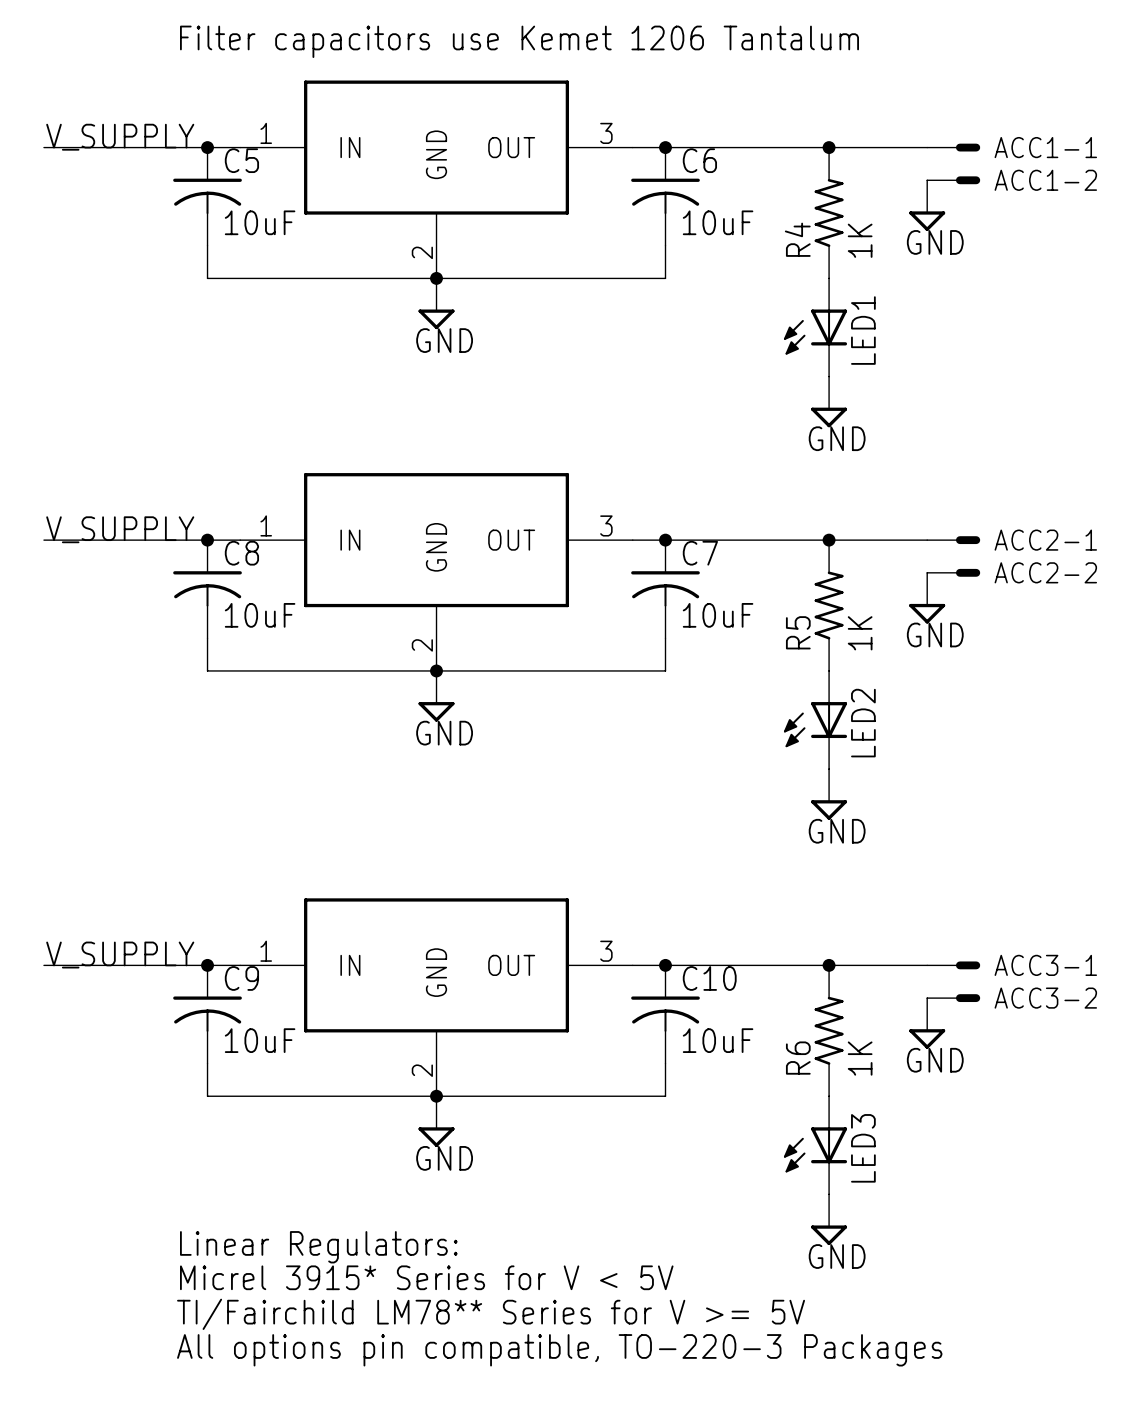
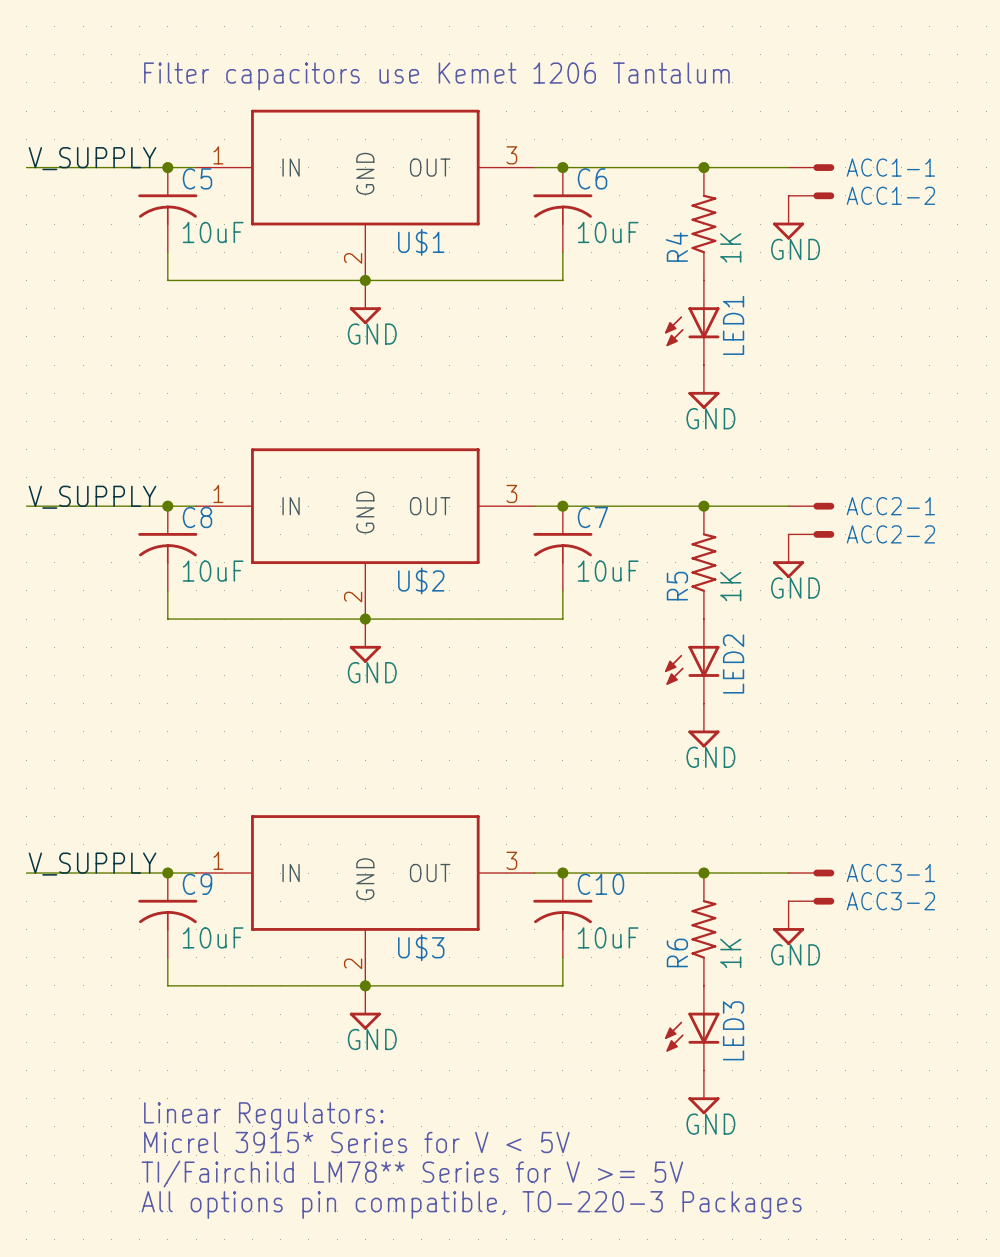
U$1 name: none -> U$1 (421, 242)
U$2 name: none -> U$2 (421, 580)
U$3 name: none -> U$3 (421, 947)

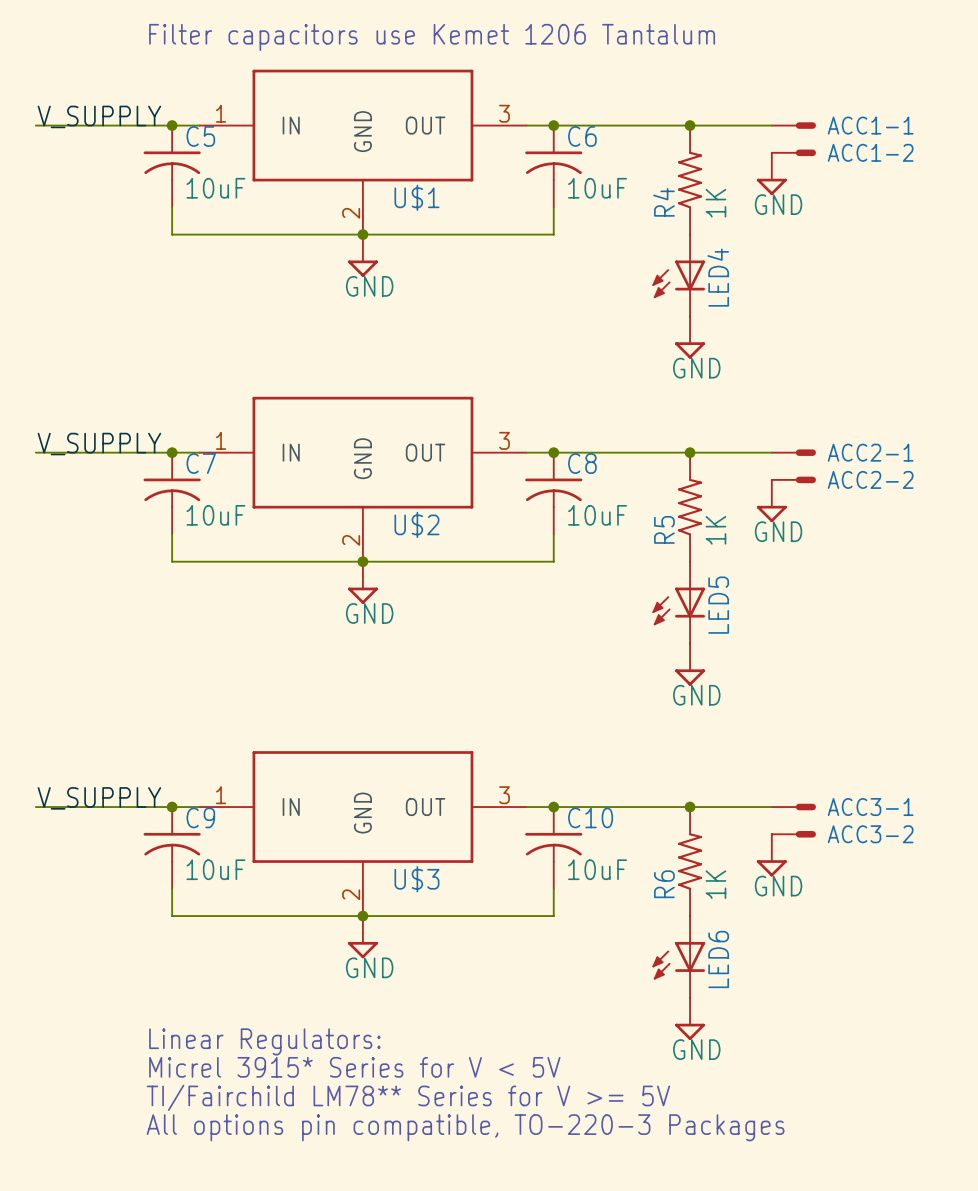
LED1 name: LED1 (733, 325) -> LED4 (718, 277)
C8 name: C8 (197, 517) -> C7 (201, 463)
C7 name: C7 (592, 517) -> C8 (582, 463)
LED2 name: LED2 (733, 664) -> LED5 (718, 605)
LED3 name: LED3 (733, 1030) -> LED6 (718, 959)

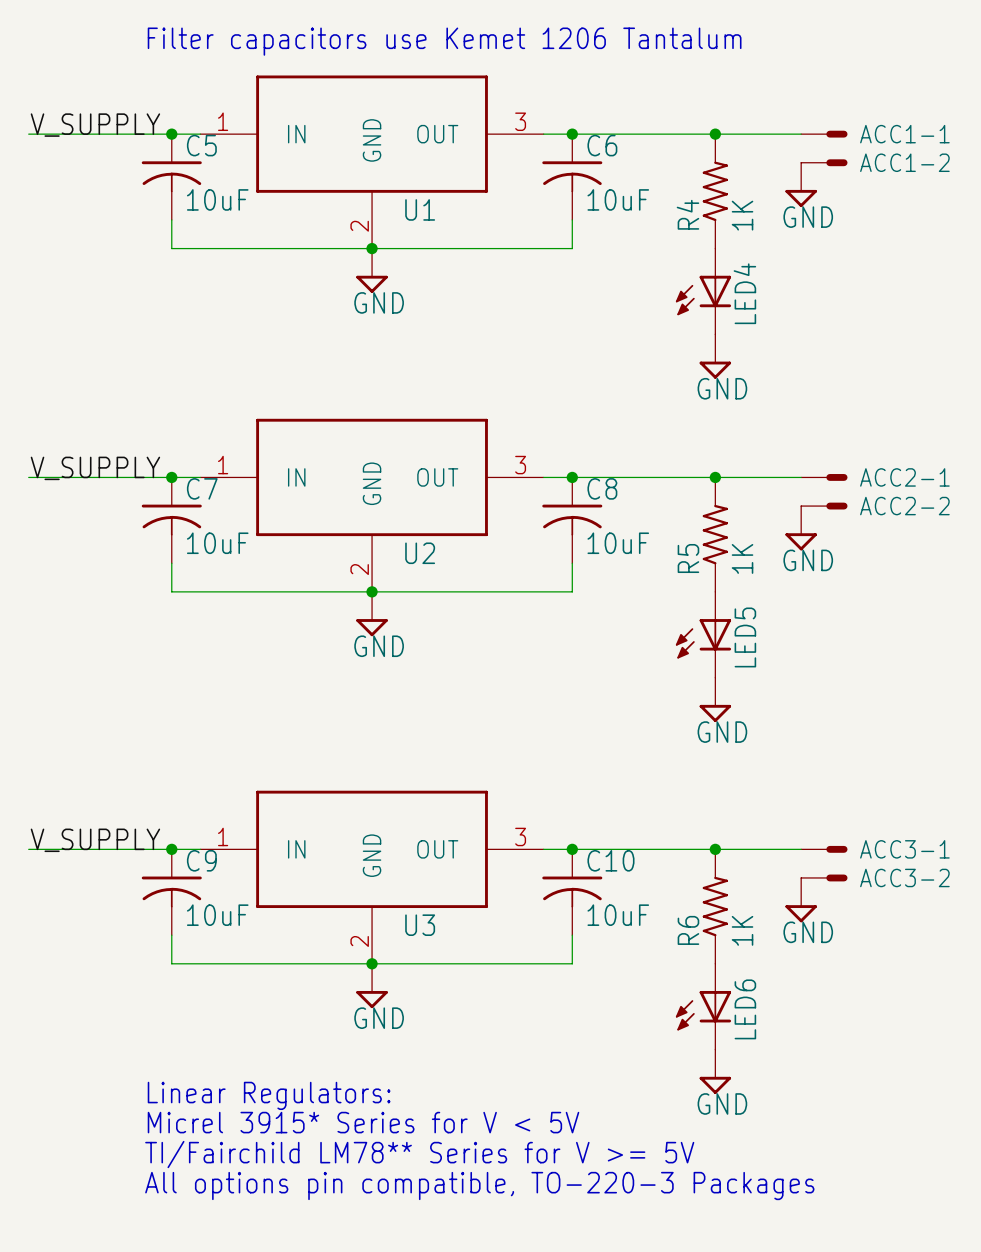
U$1 name: U$1 (416, 197) -> U1 (420, 209)
U$2 name: U$2 (416, 524) -> U2 (420, 553)
U$3 name: U$3 (416, 879) -> U3 (420, 925)

